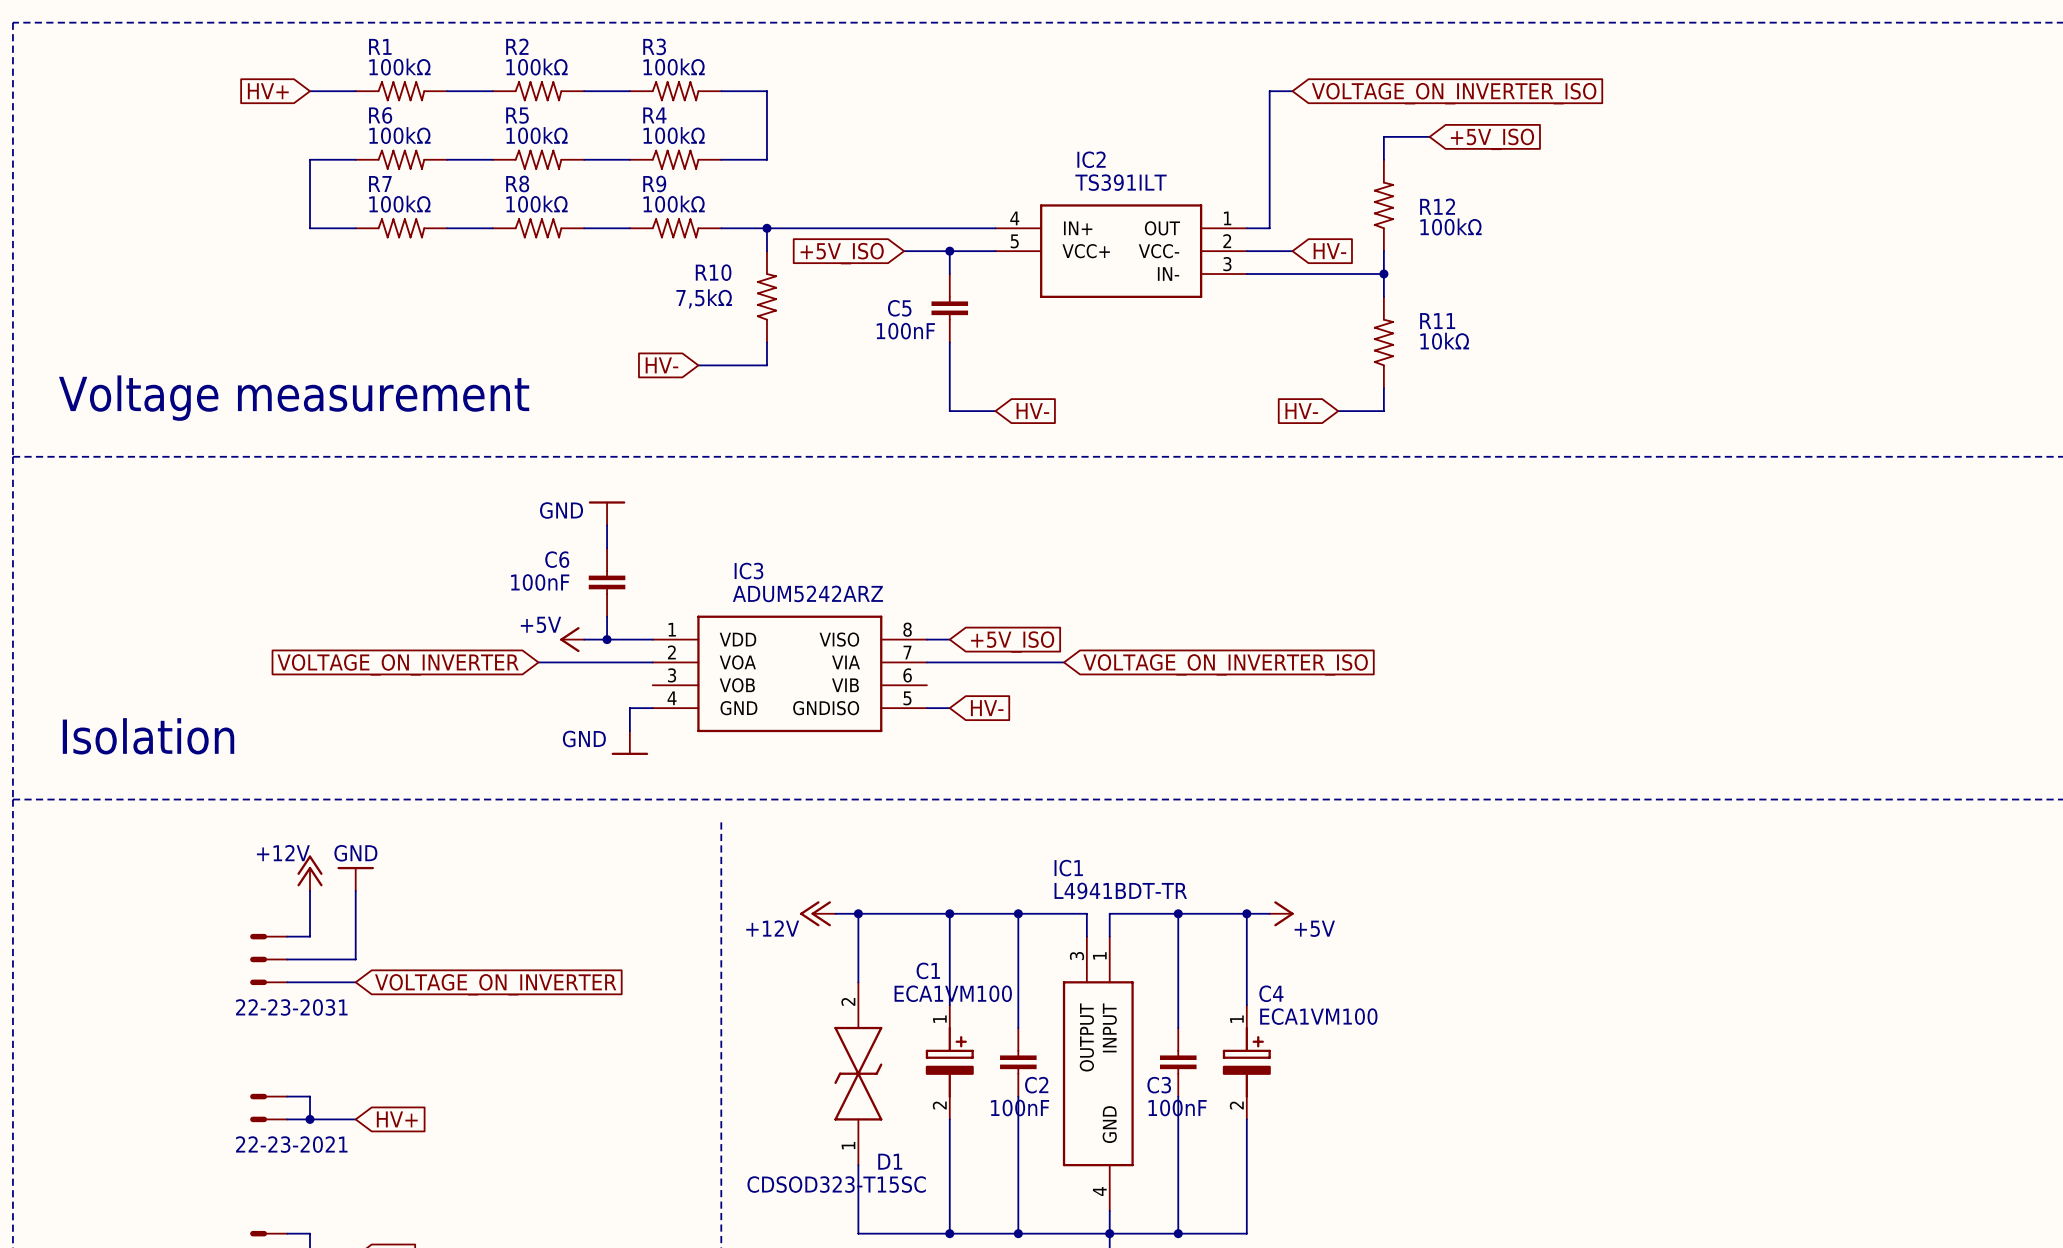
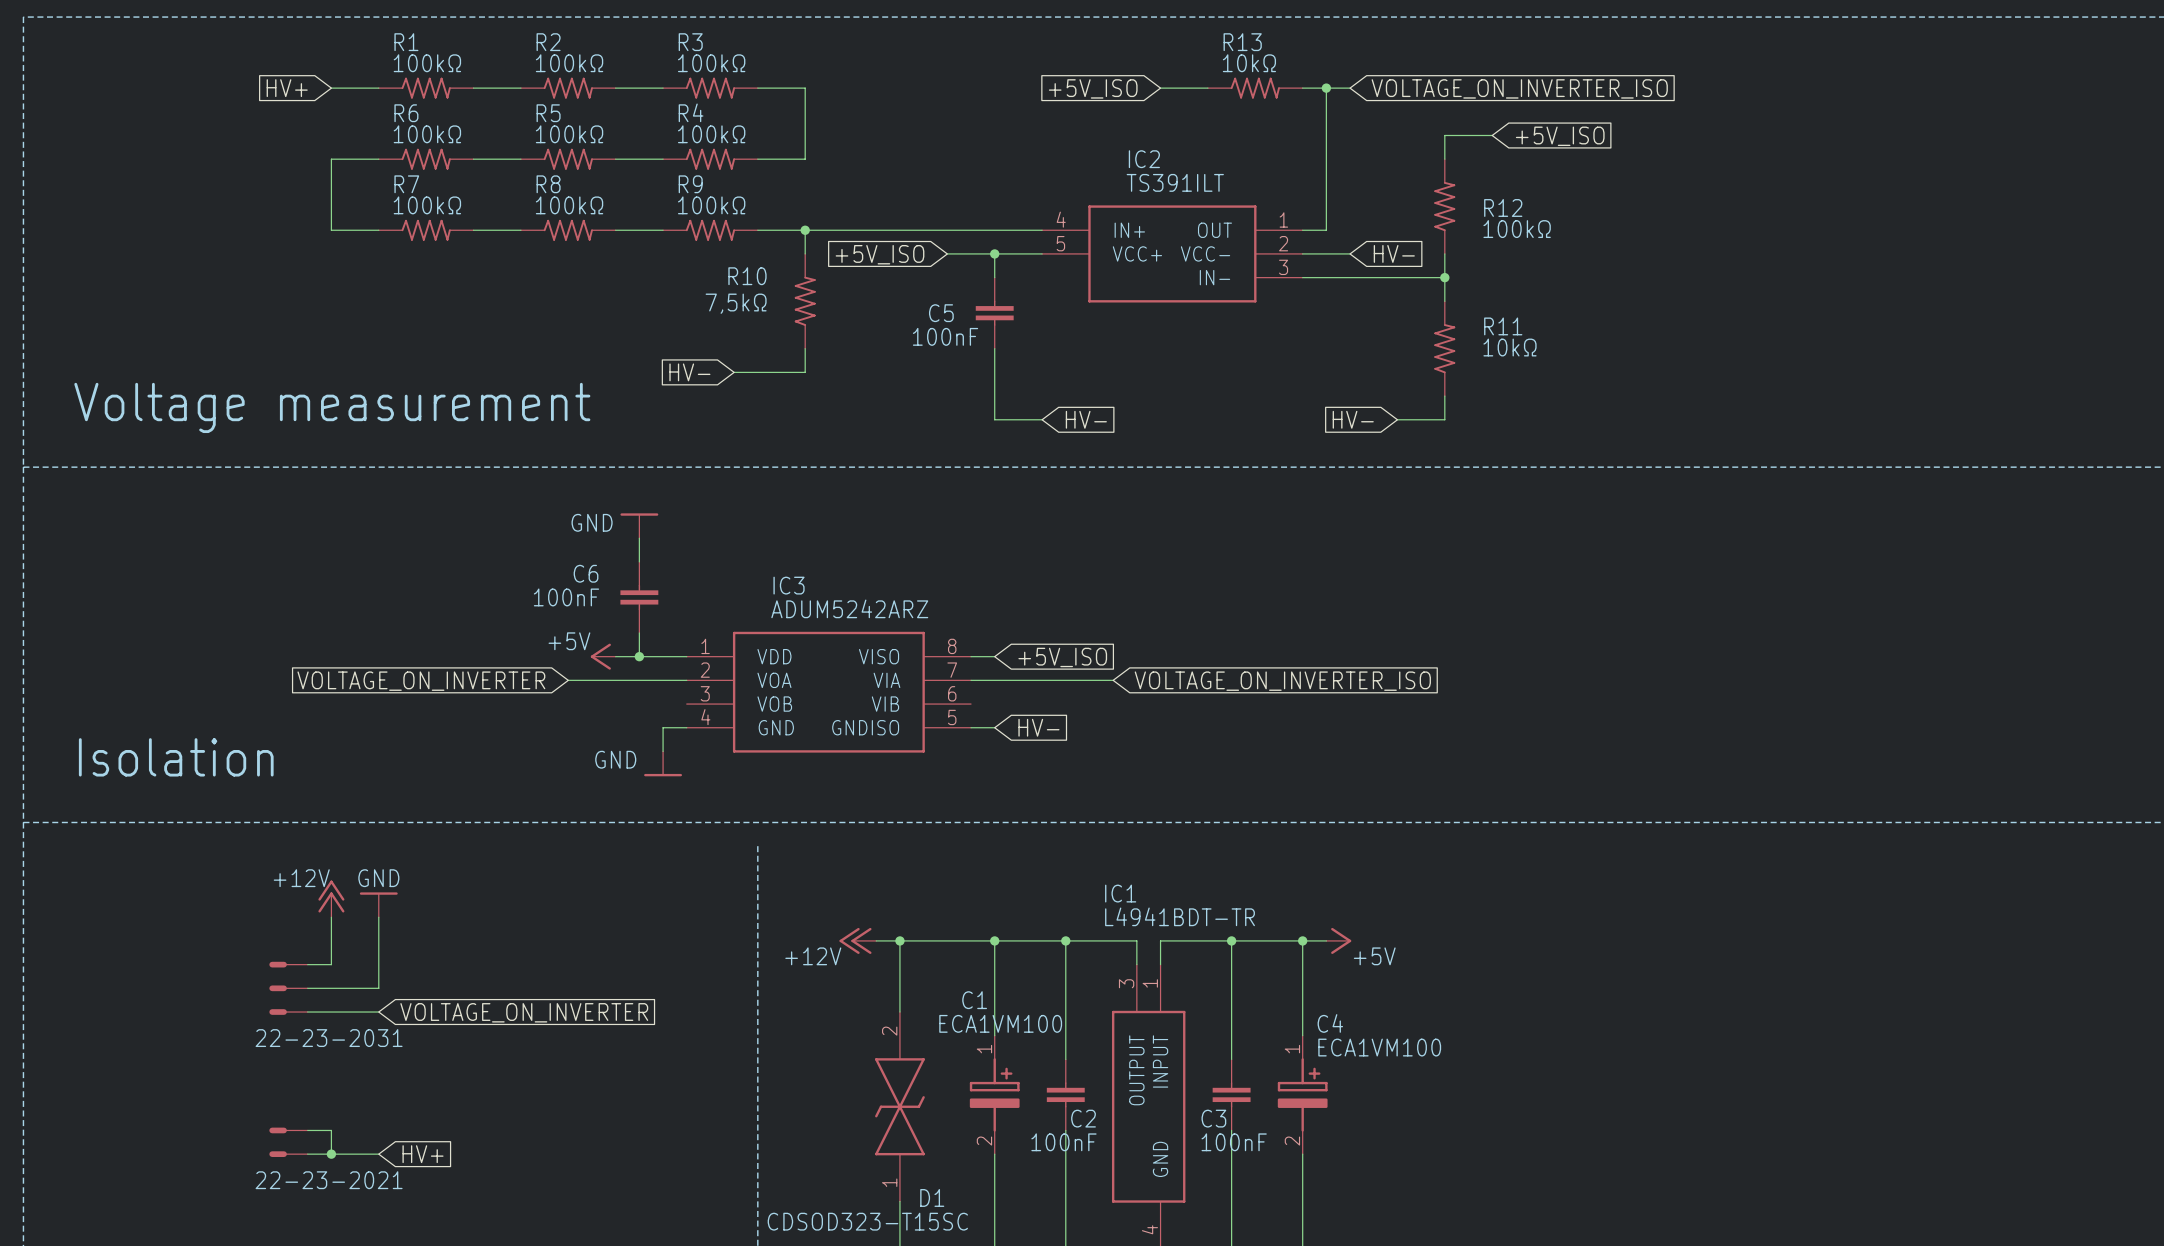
wire: none -> (1160, 88) (1207, 88)
R13: none -> 10kΩ (1255, 88)
wire: none -> (1302, 88) (1326, 88)
junction: none -> (1326, 88)
global label: none -> +5V_ISO (1093, 88)

